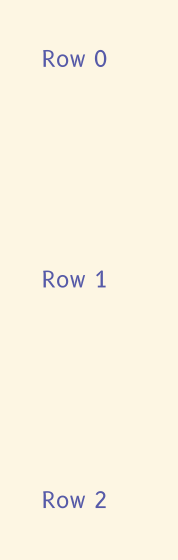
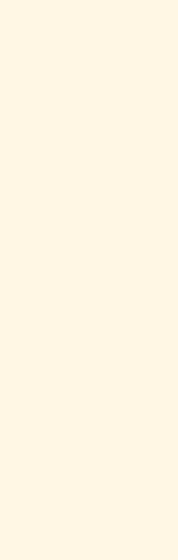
text: Row 0 (74, 58) -> none
text: Row 1 (74, 279) -> none
text: Row 2 (74, 499) -> none

